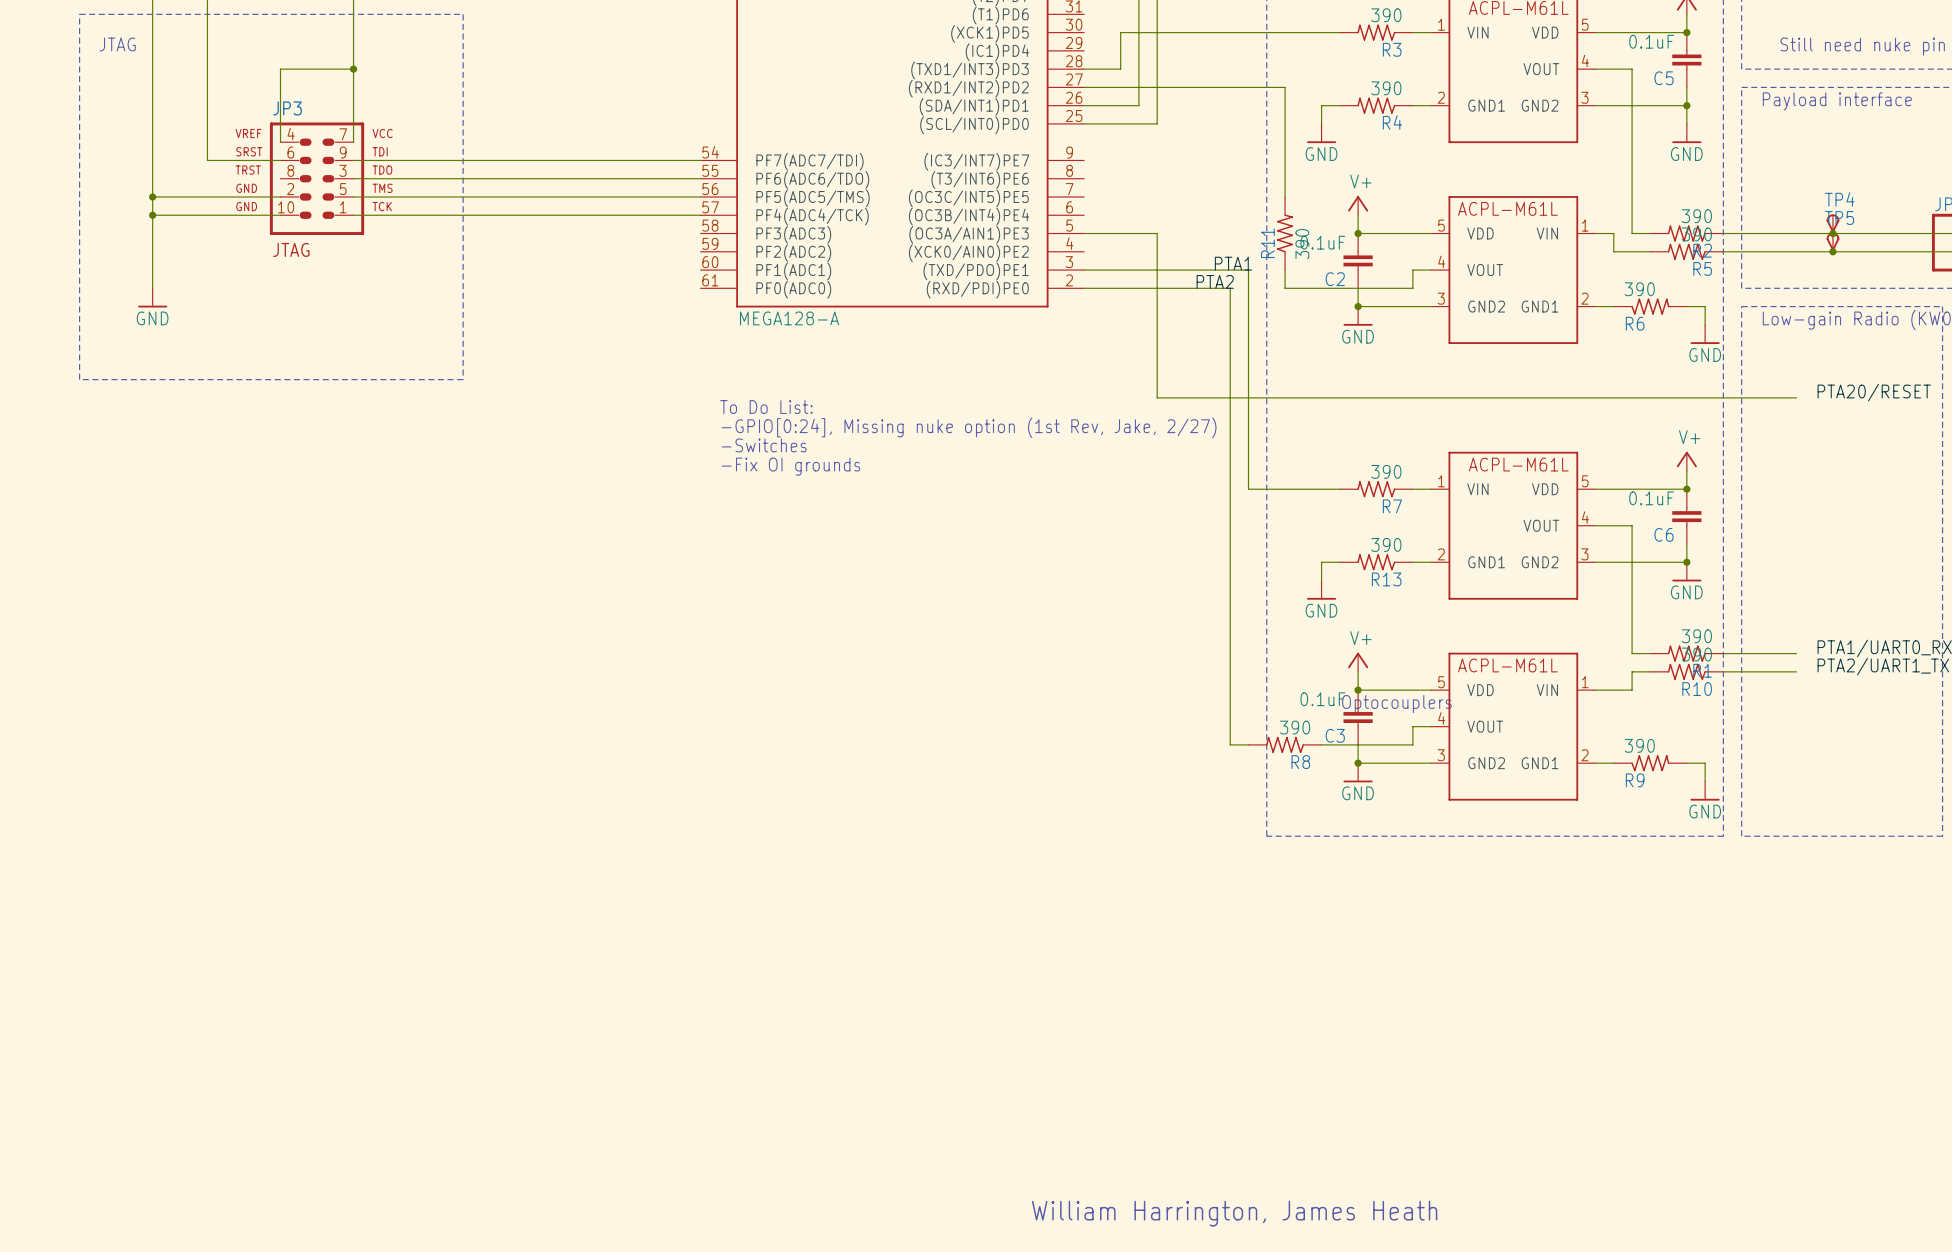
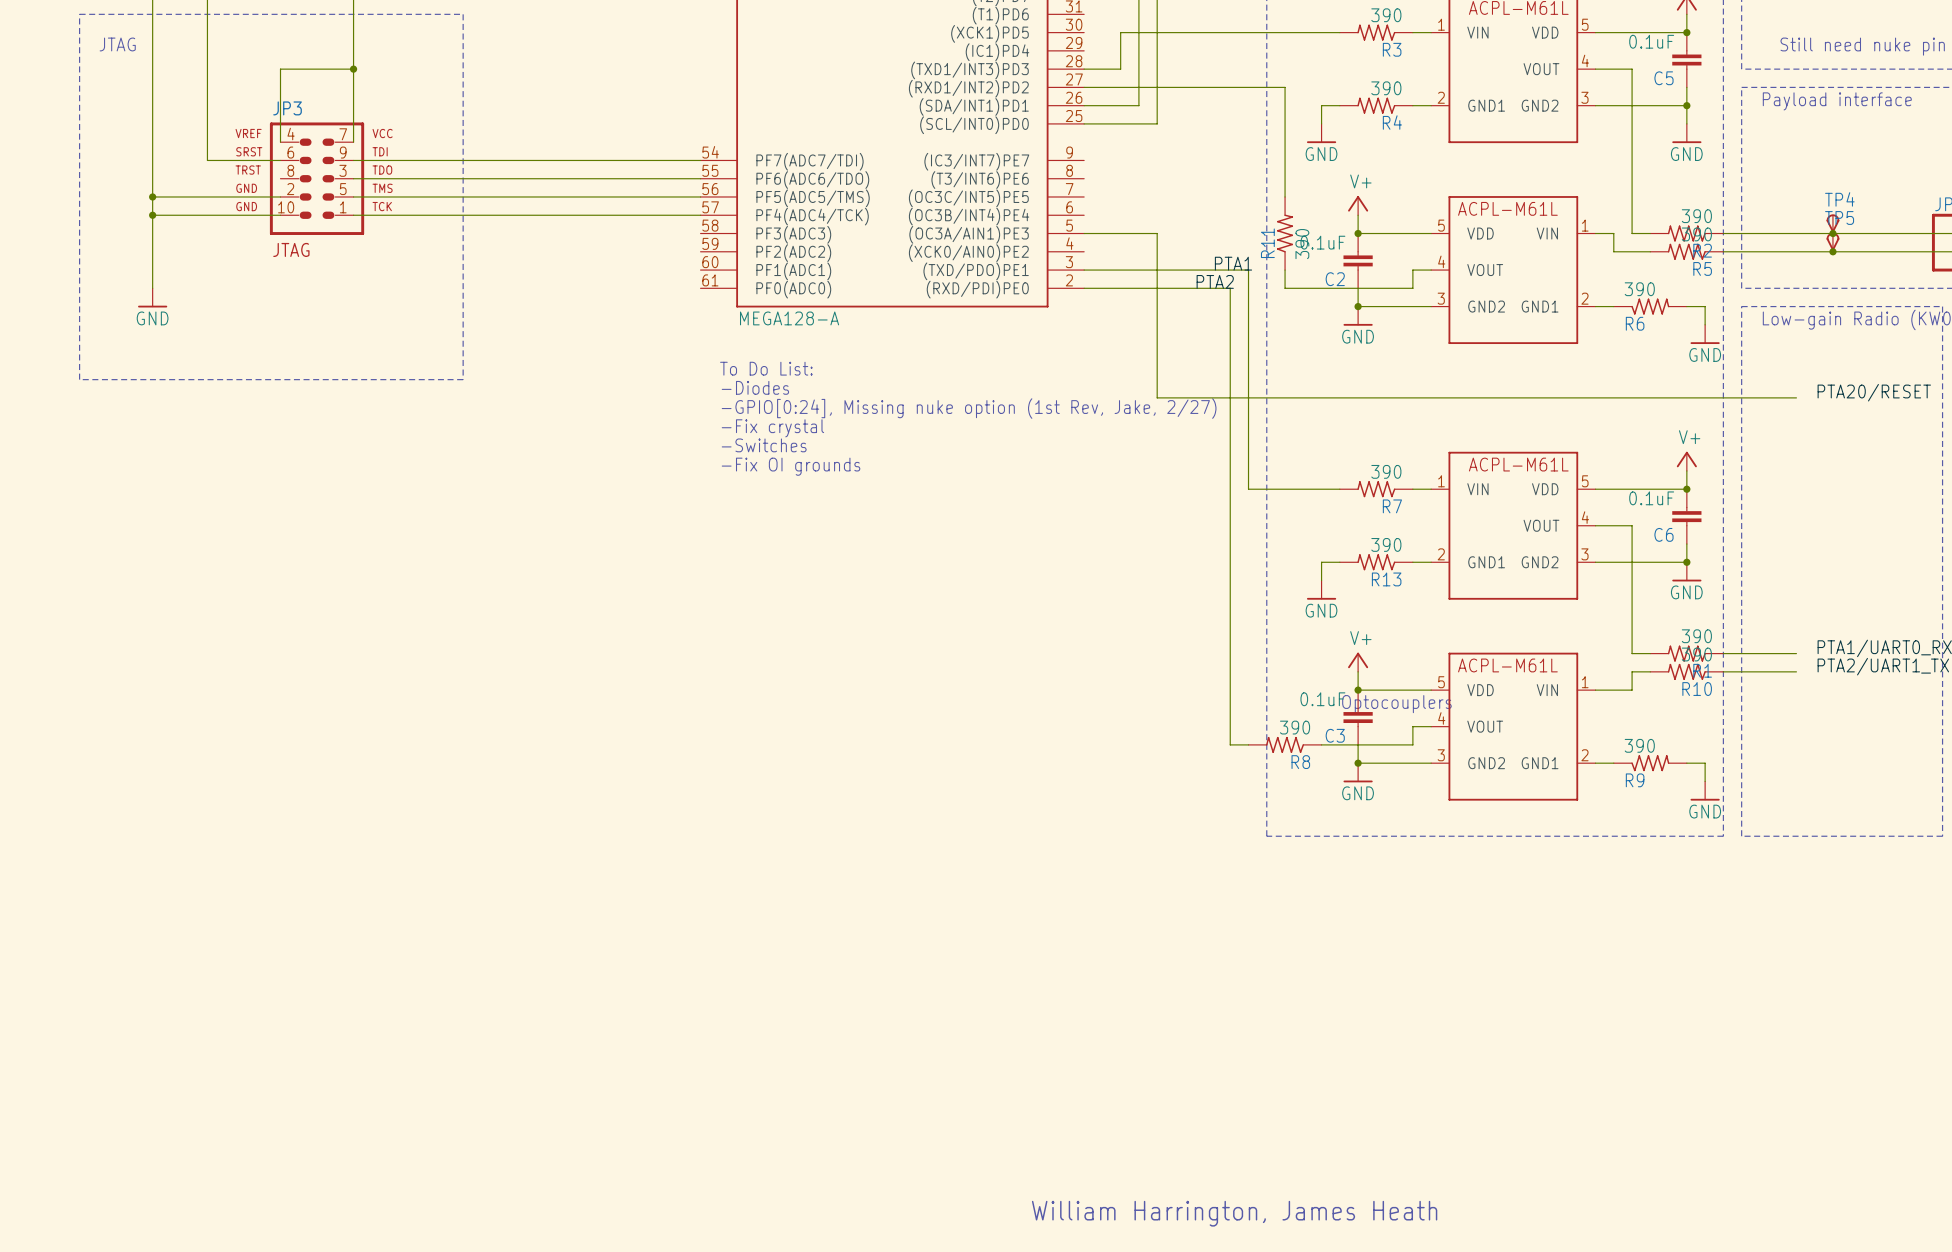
text: none -> To Do List: (766, 368)
text: none -> -Diodes (755, 387)
text: To Do List: (766, 407) -> -GPIO[0:24], Missing nuke option (1st Rev, Jake, 2/27) (969, 408)
text: -GPIO[0:24], Missing nuke option (1st Rev, Jake, 2/27) (969, 427) -> -Fix crystal (772, 428)

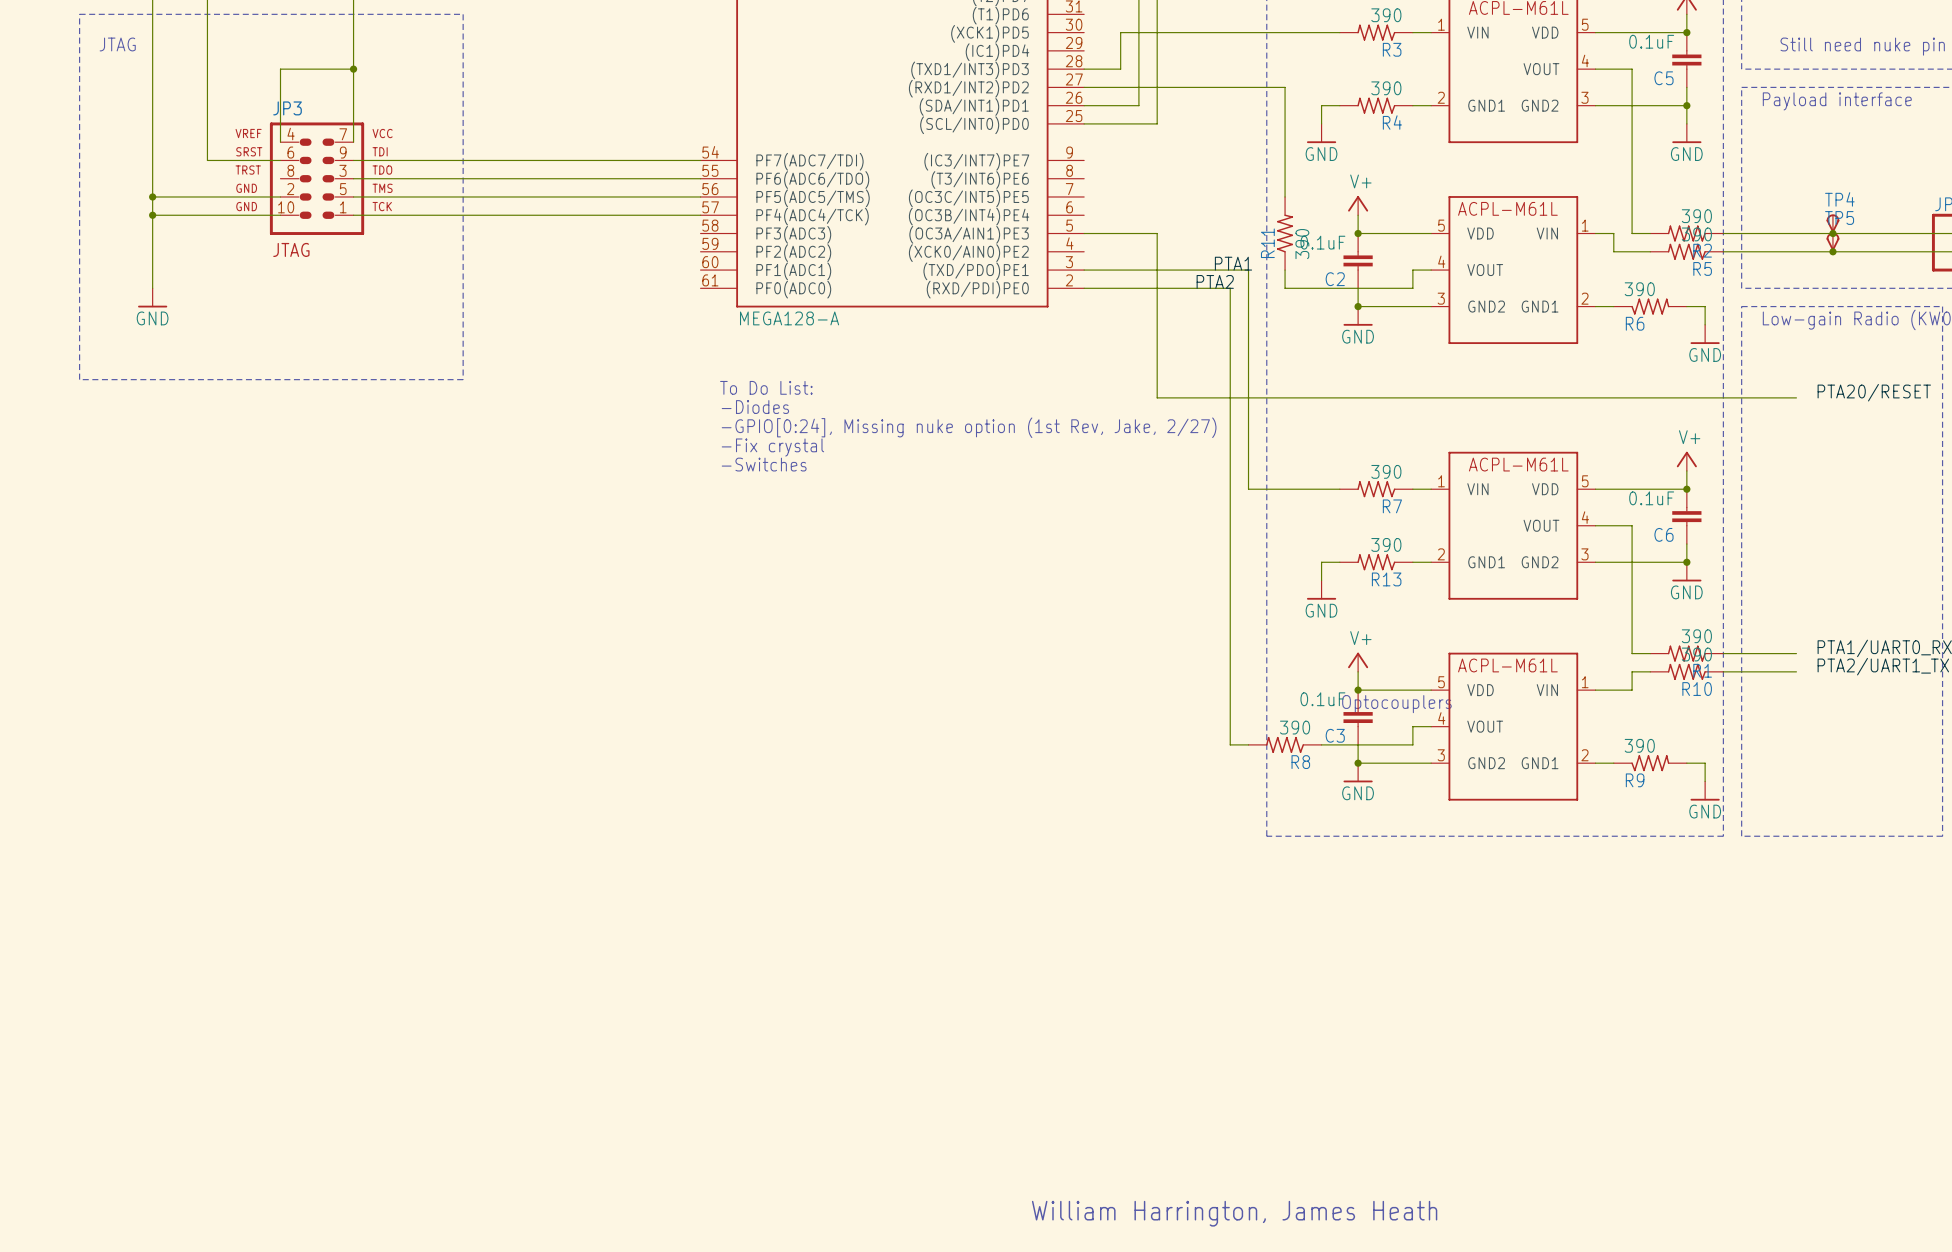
text: To Do List: (766, 368) -> none
text: -Diodes (755, 387) -> To Do List: (766, 387)
text: -GPIO[0:24], Missing nuke option (1st Rev, Jake, 2/27) (969, 408) -> -Diodes (755, 407)
text: -Fix crystal (772, 428) -> -GPIO[0:24], Missing nuke option (1st Rev, Jake, 2/27) (969, 427)
text: -Switches (764, 445) -> -Fix crystal (772, 447)
text: -Fix OI grounds (791, 466) -> -Switches (764, 464)

